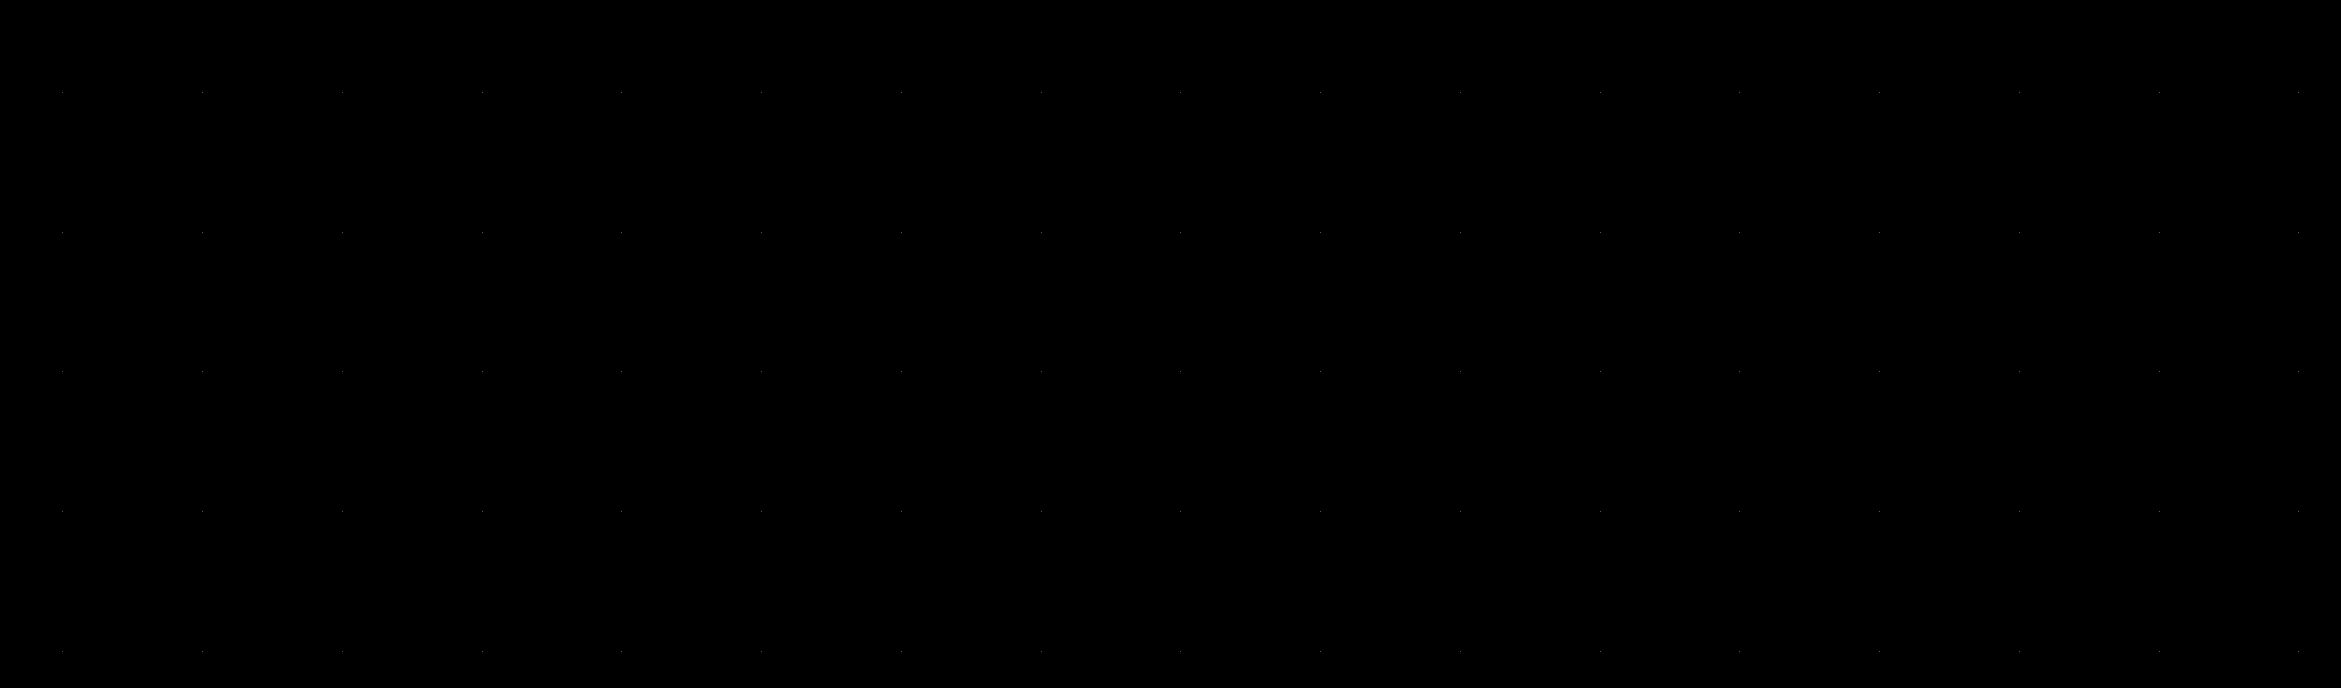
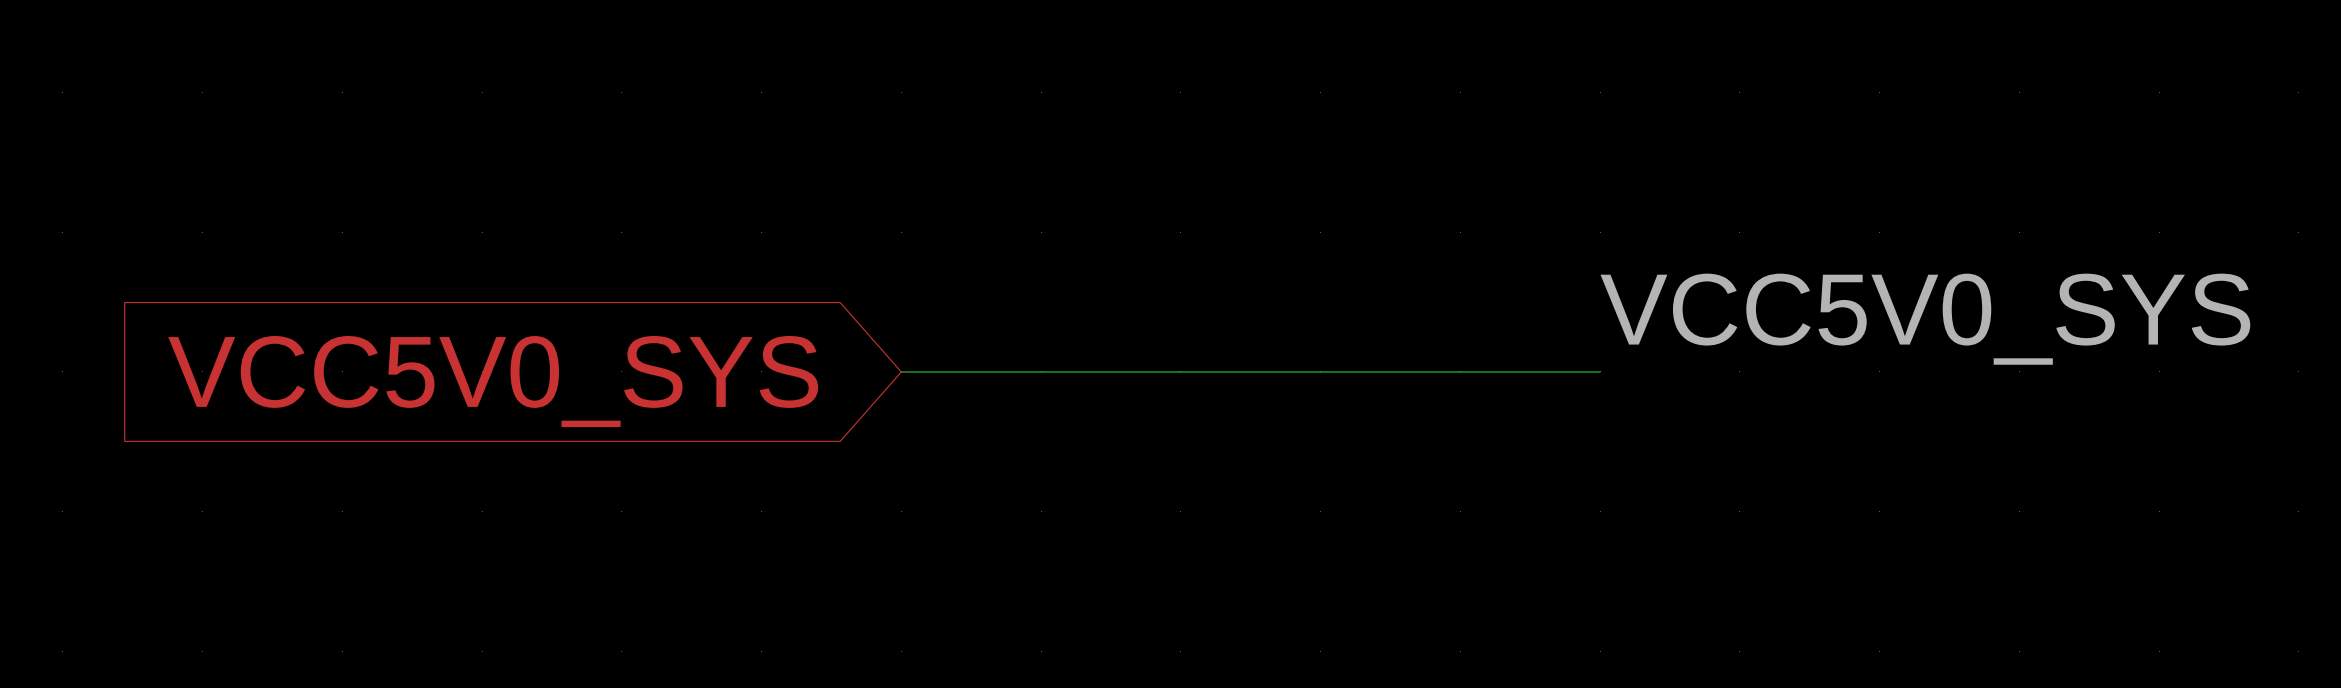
label: none -> VCC5V0_SYS (1925, 319)
wire: none -> (901, 371) (1600, 371)
global label: none -> VCC5V0_SYS (493, 381)

